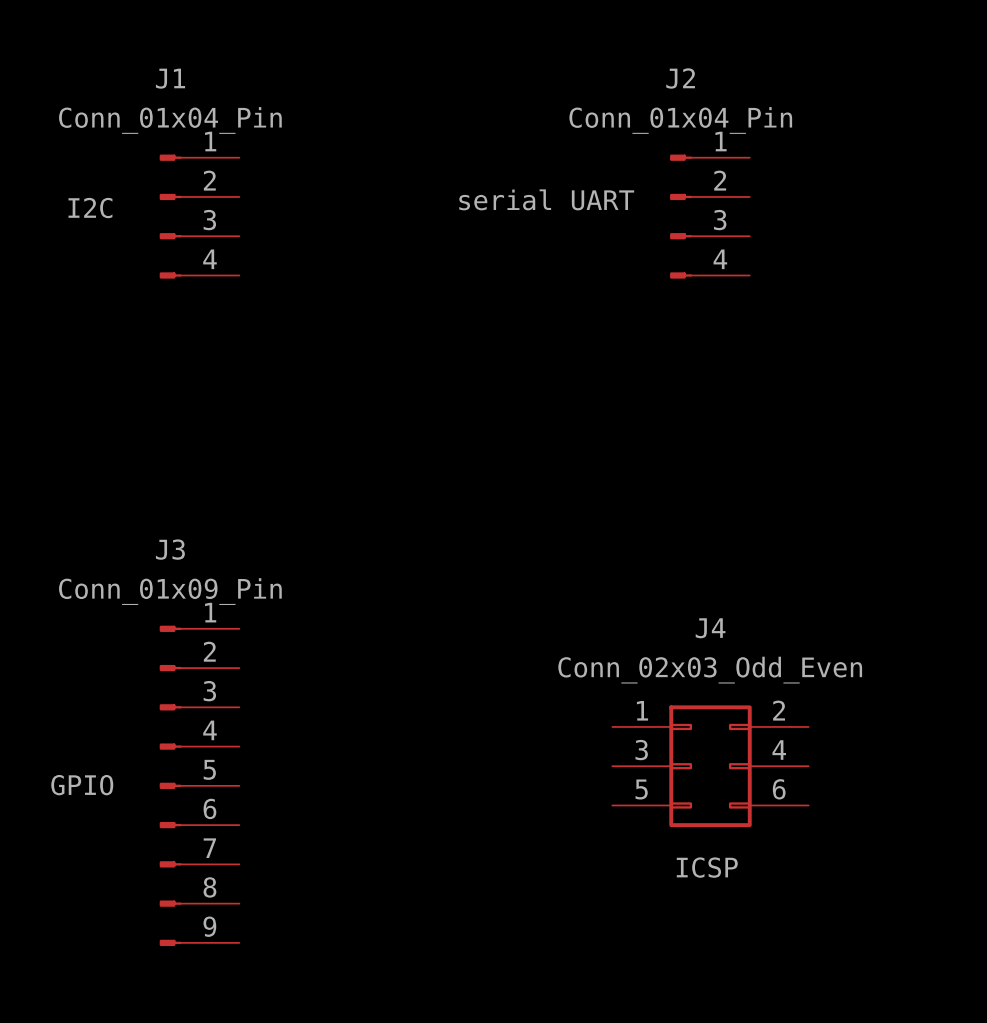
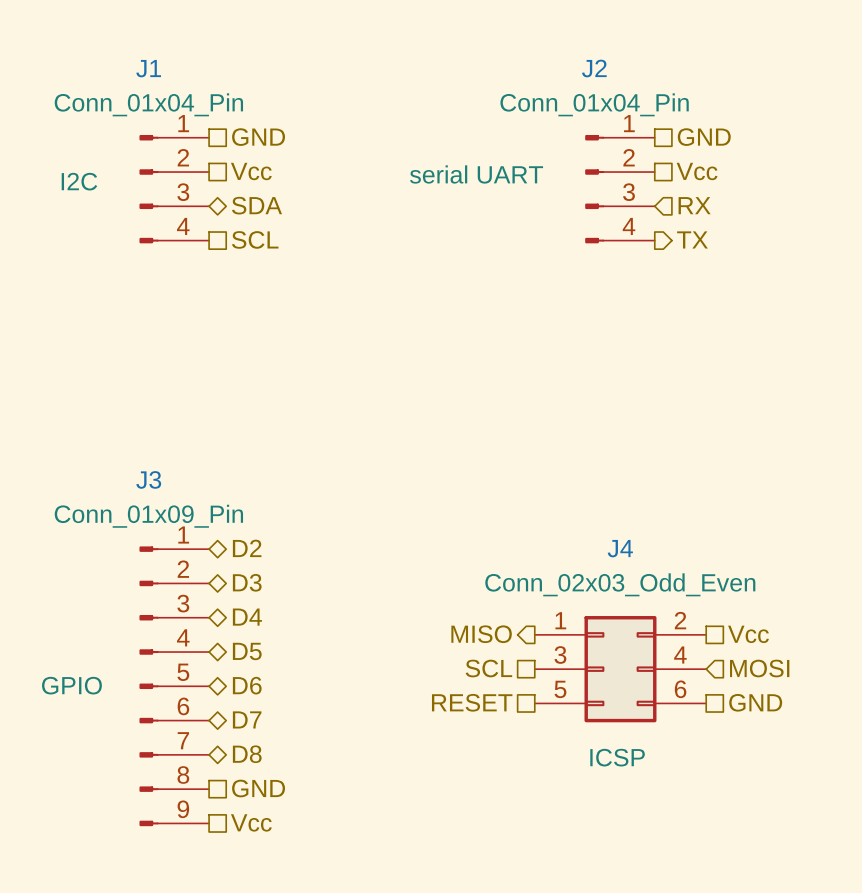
hierarchical label: none -> GND (258, 137)
hierarchical label: none -> GND (704, 137)
hierarchical label: none -> Vcc (251, 171)
hierarchical label: none -> Vcc (697, 171)
hierarchical label: none -> SDA (257, 205)
hierarchical label: none -> RX (694, 205)
hierarchical label: none -> SCL (255, 239)
hierarchical label: none -> TX (692, 239)
hierarchical label: none -> D2 (247, 548)
hierarchical label: none -> D3 (247, 582)
hierarchical label: none -> D4 (247, 617)
hierarchical label: none -> MISO (481, 634)
hierarchical label: none -> Vcc (748, 634)
hierarchical label: none -> D5 (247, 651)
hierarchical label: none -> SCL (488, 668)
hierarchical label: none -> MOSI (759, 668)
hierarchical label: none -> D6 (247, 685)
hierarchical label: none -> RESET (472, 702)
hierarchical label: none -> GND (755, 702)
hierarchical label: none -> D7 (247, 719)
hierarchical label: none -> D8 (247, 754)
hierarchical label: none -> GND (258, 788)
hierarchical label: none -> Vcc (251, 822)

